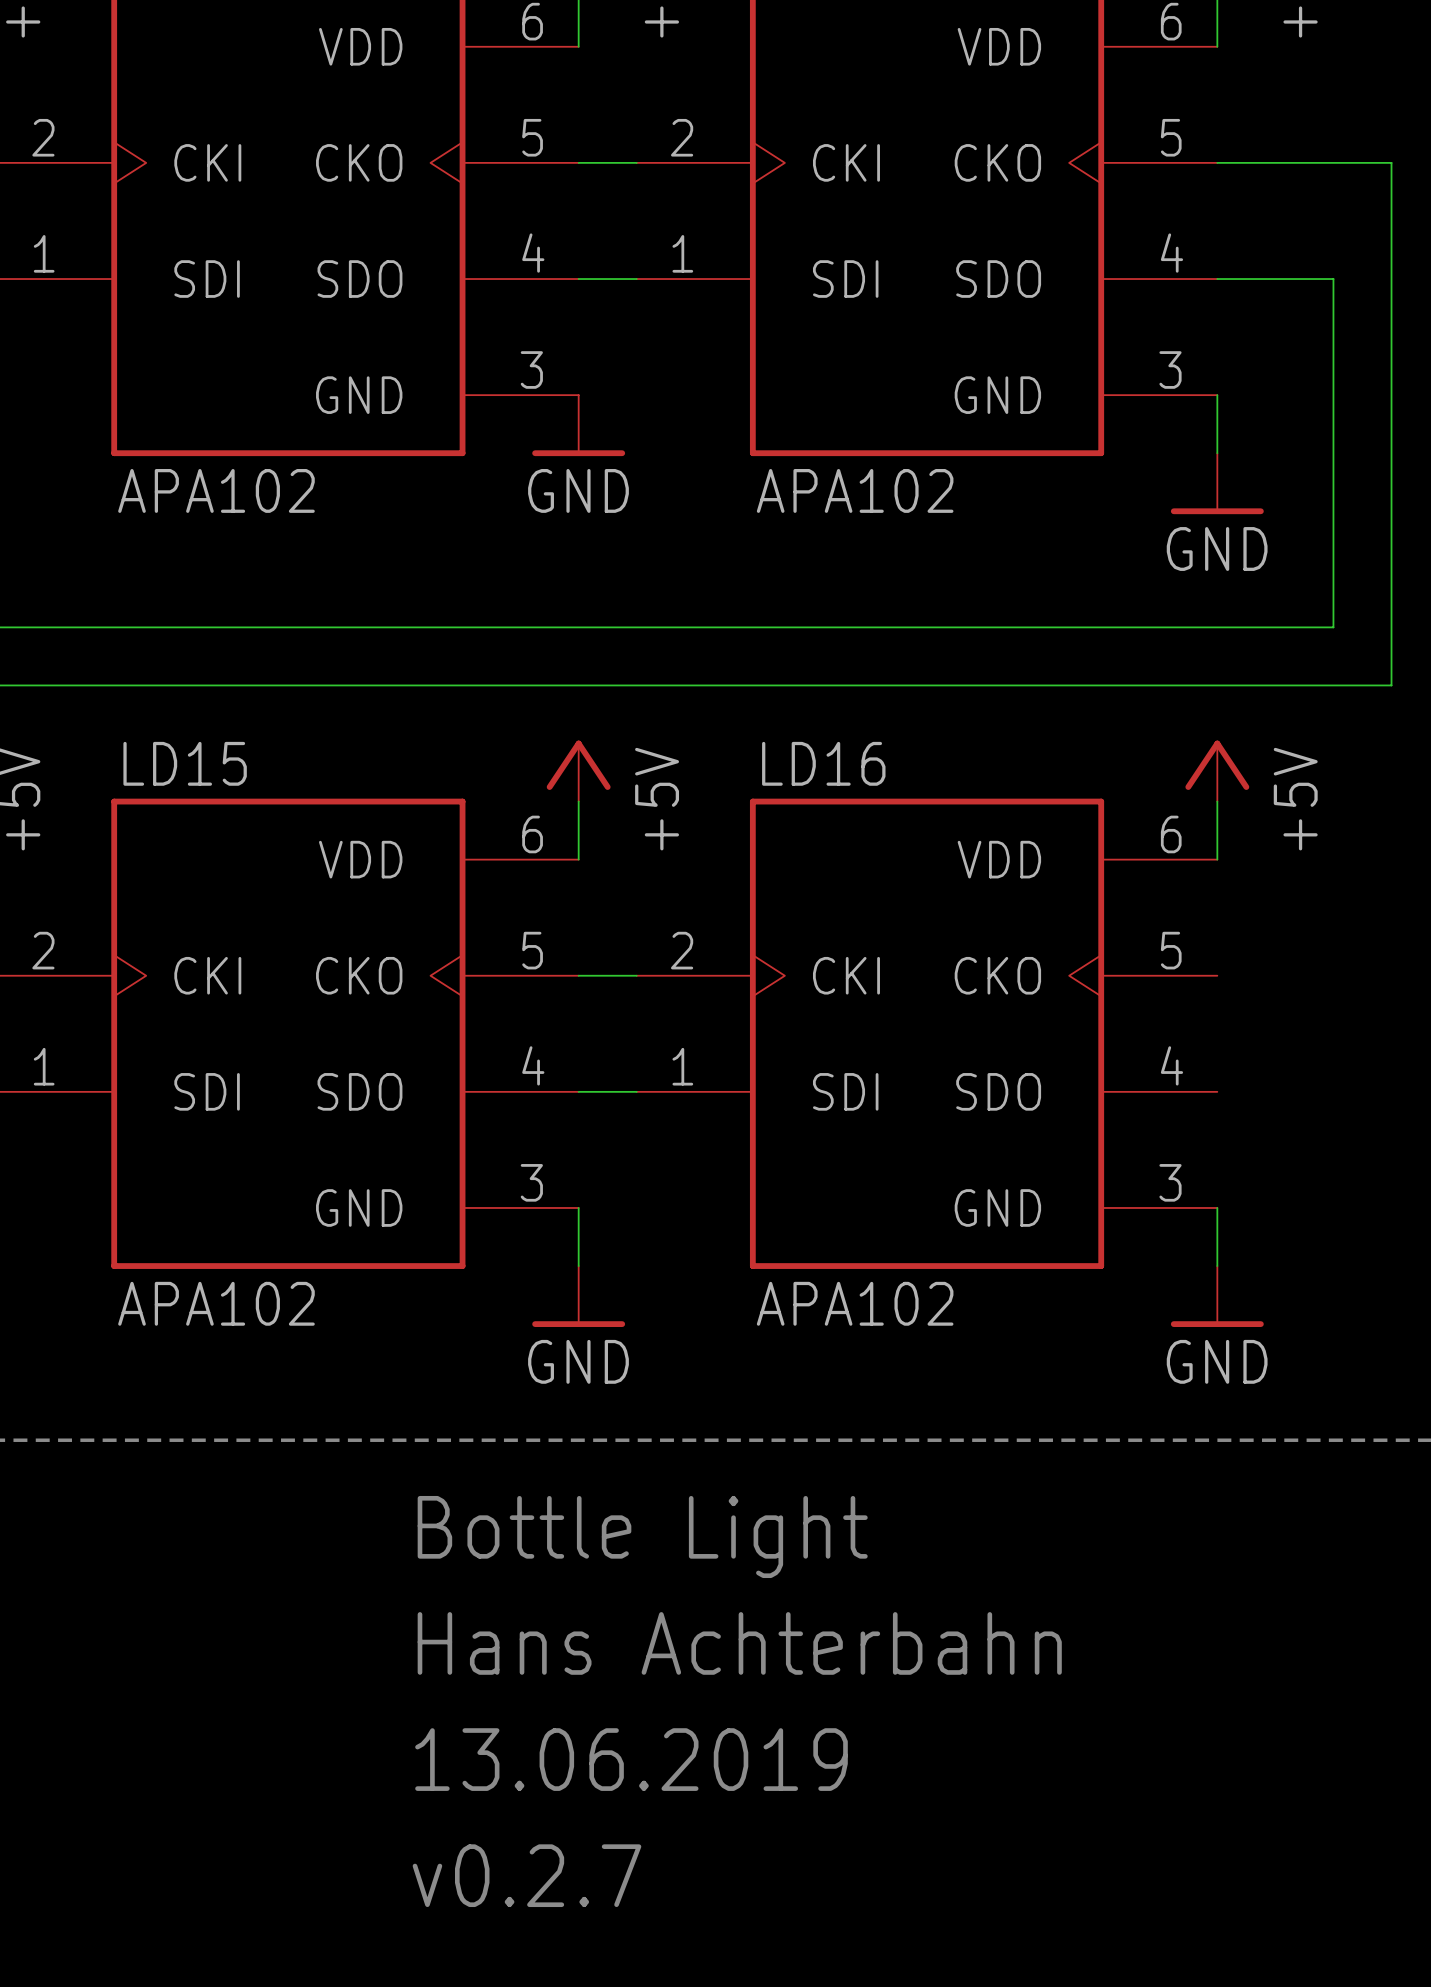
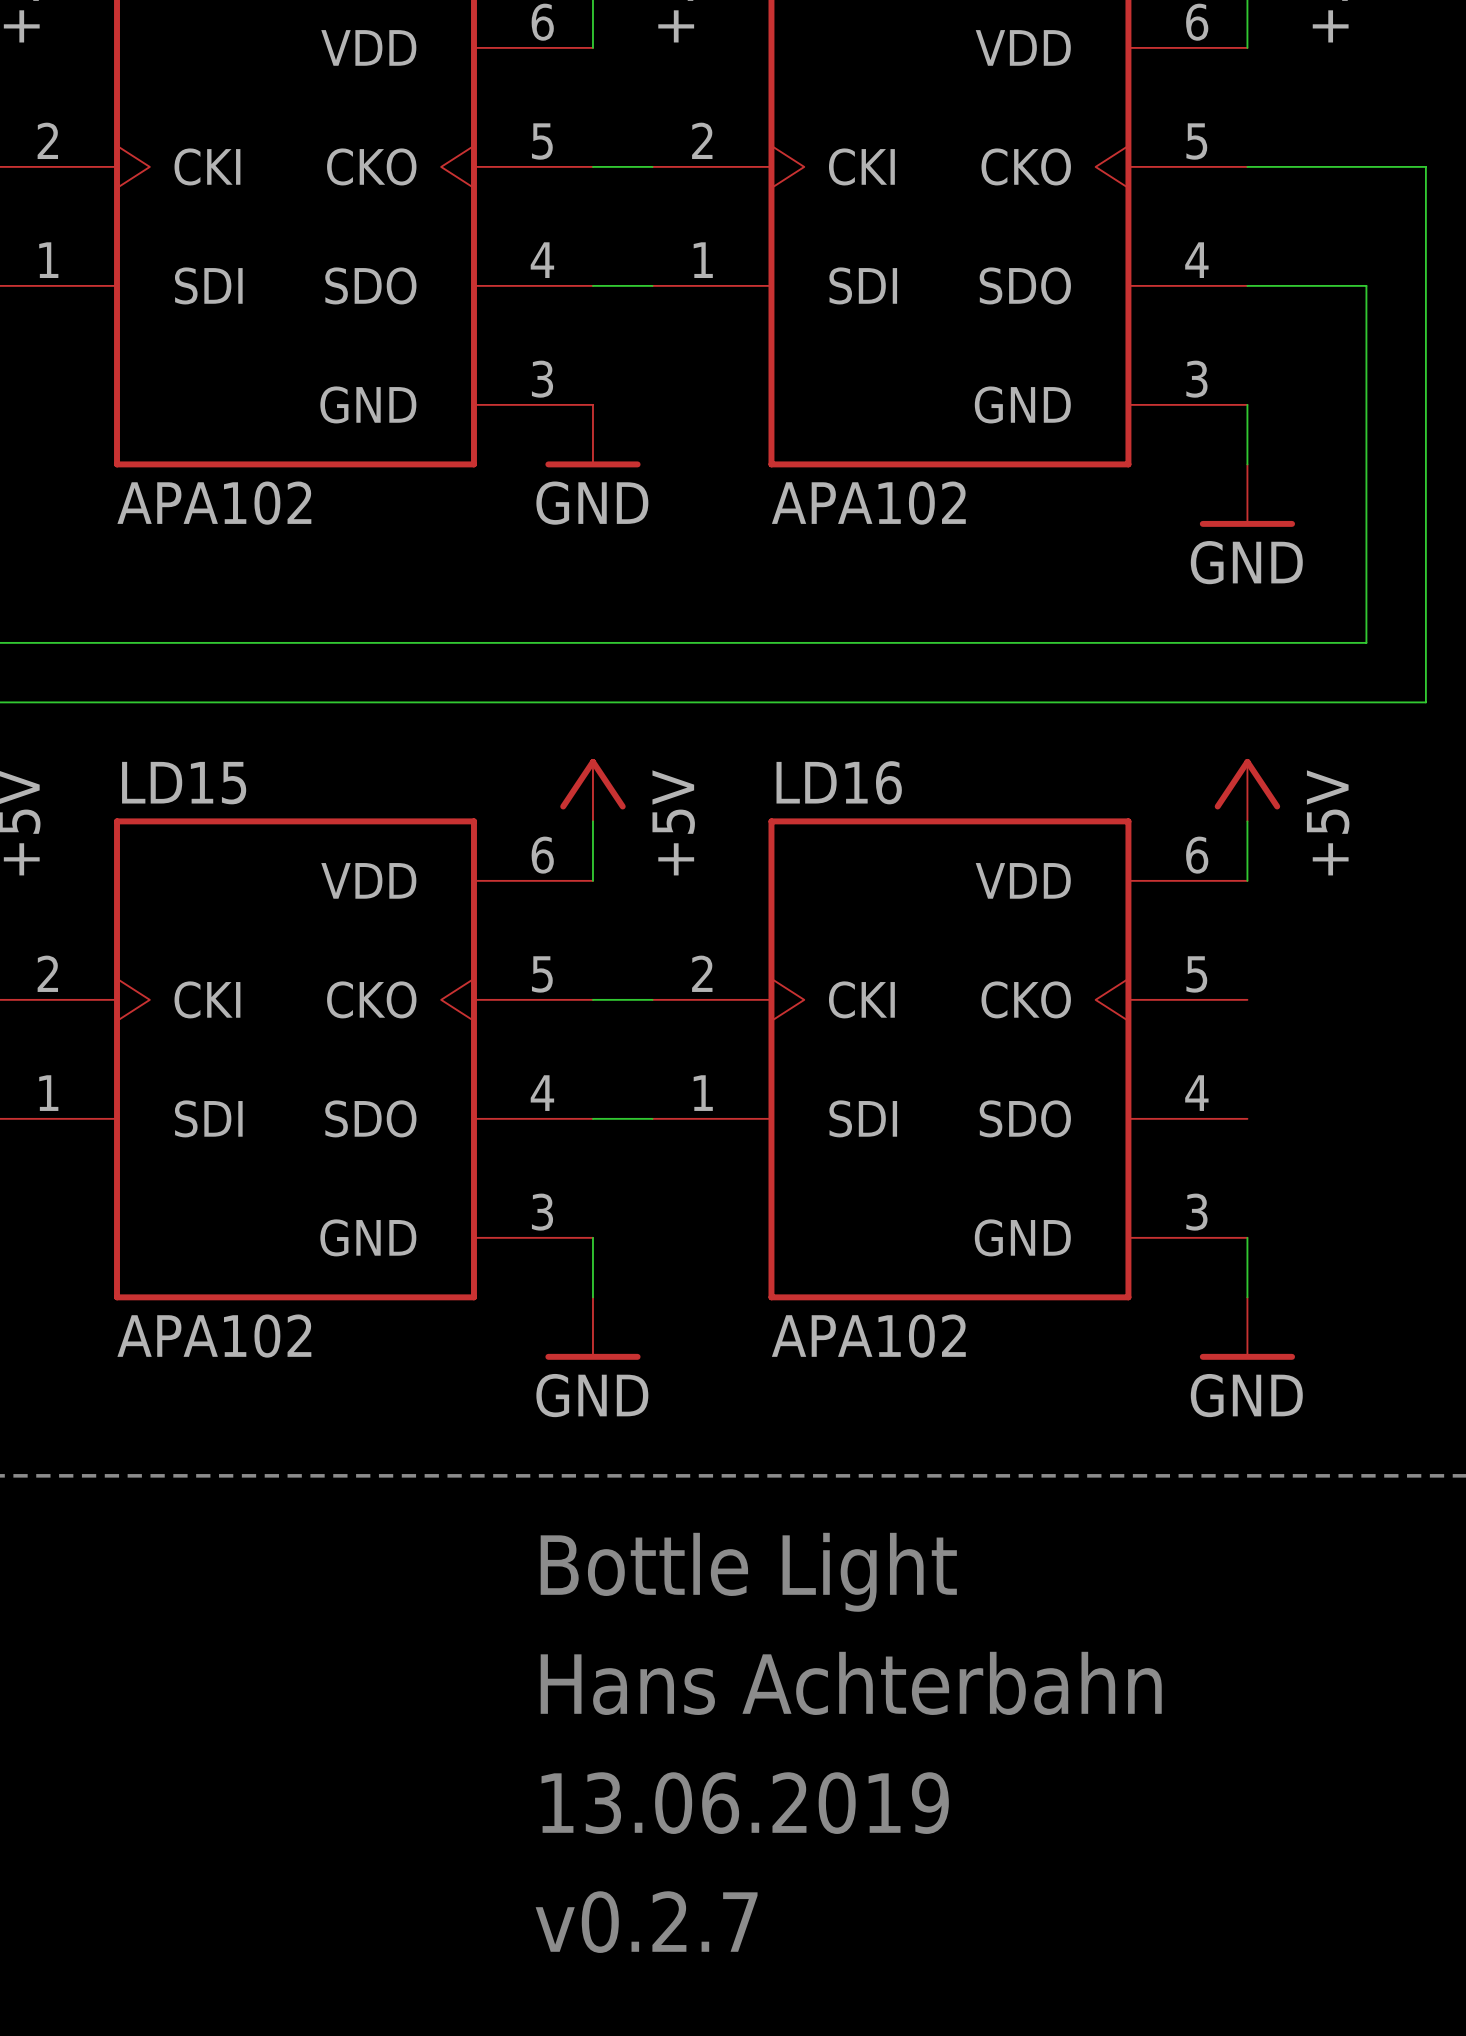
text position: Bottle Light (642, 1536) -> Bottle Light (748, 1572)
text position: Hans Achterbahn (739, 1643) -> Hans Achterbahn (851, 1683)
text position: 13.06.2019 (631, 1759) -> 13.06.2019 (745, 1803)
text position: v0.2.7 (526, 1875) -> v0.2.7 (646, 1922)

